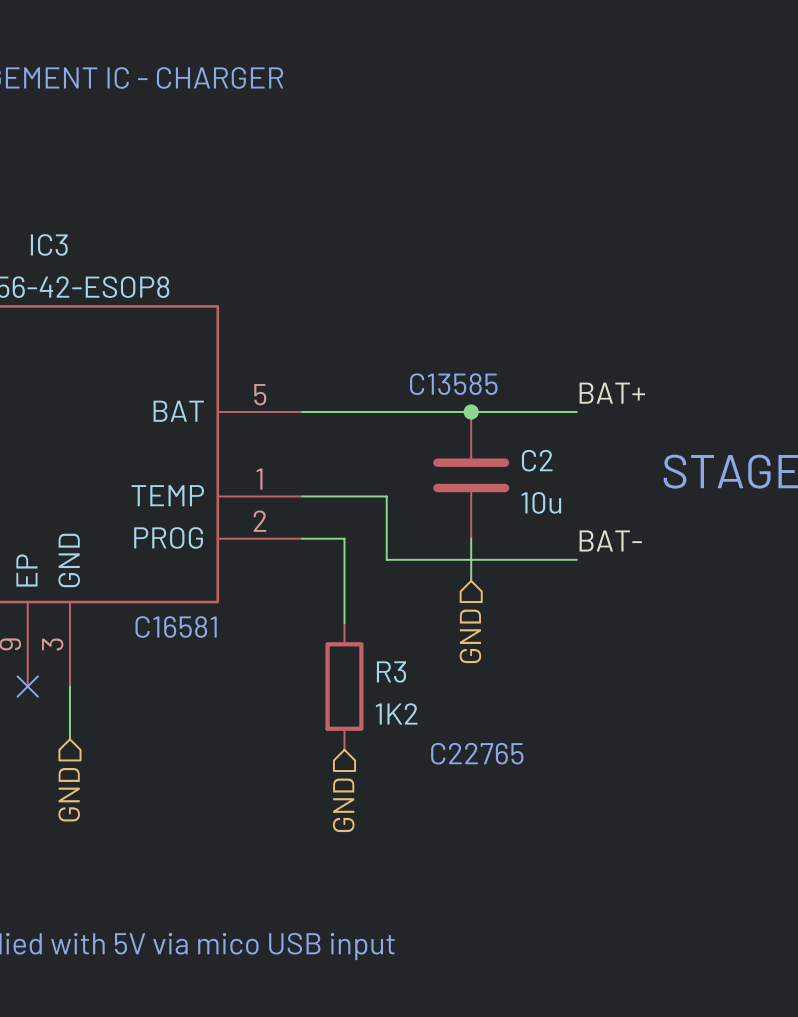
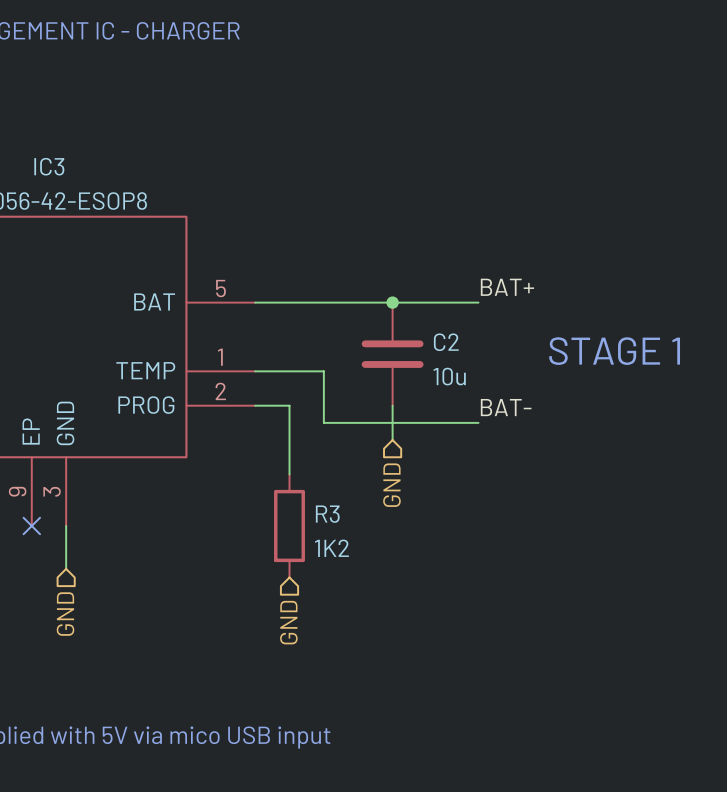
text: C13585 (453, 384) -> none
text: C16581 (176, 626) -> none
text: C22765 (477, 753) -> none

